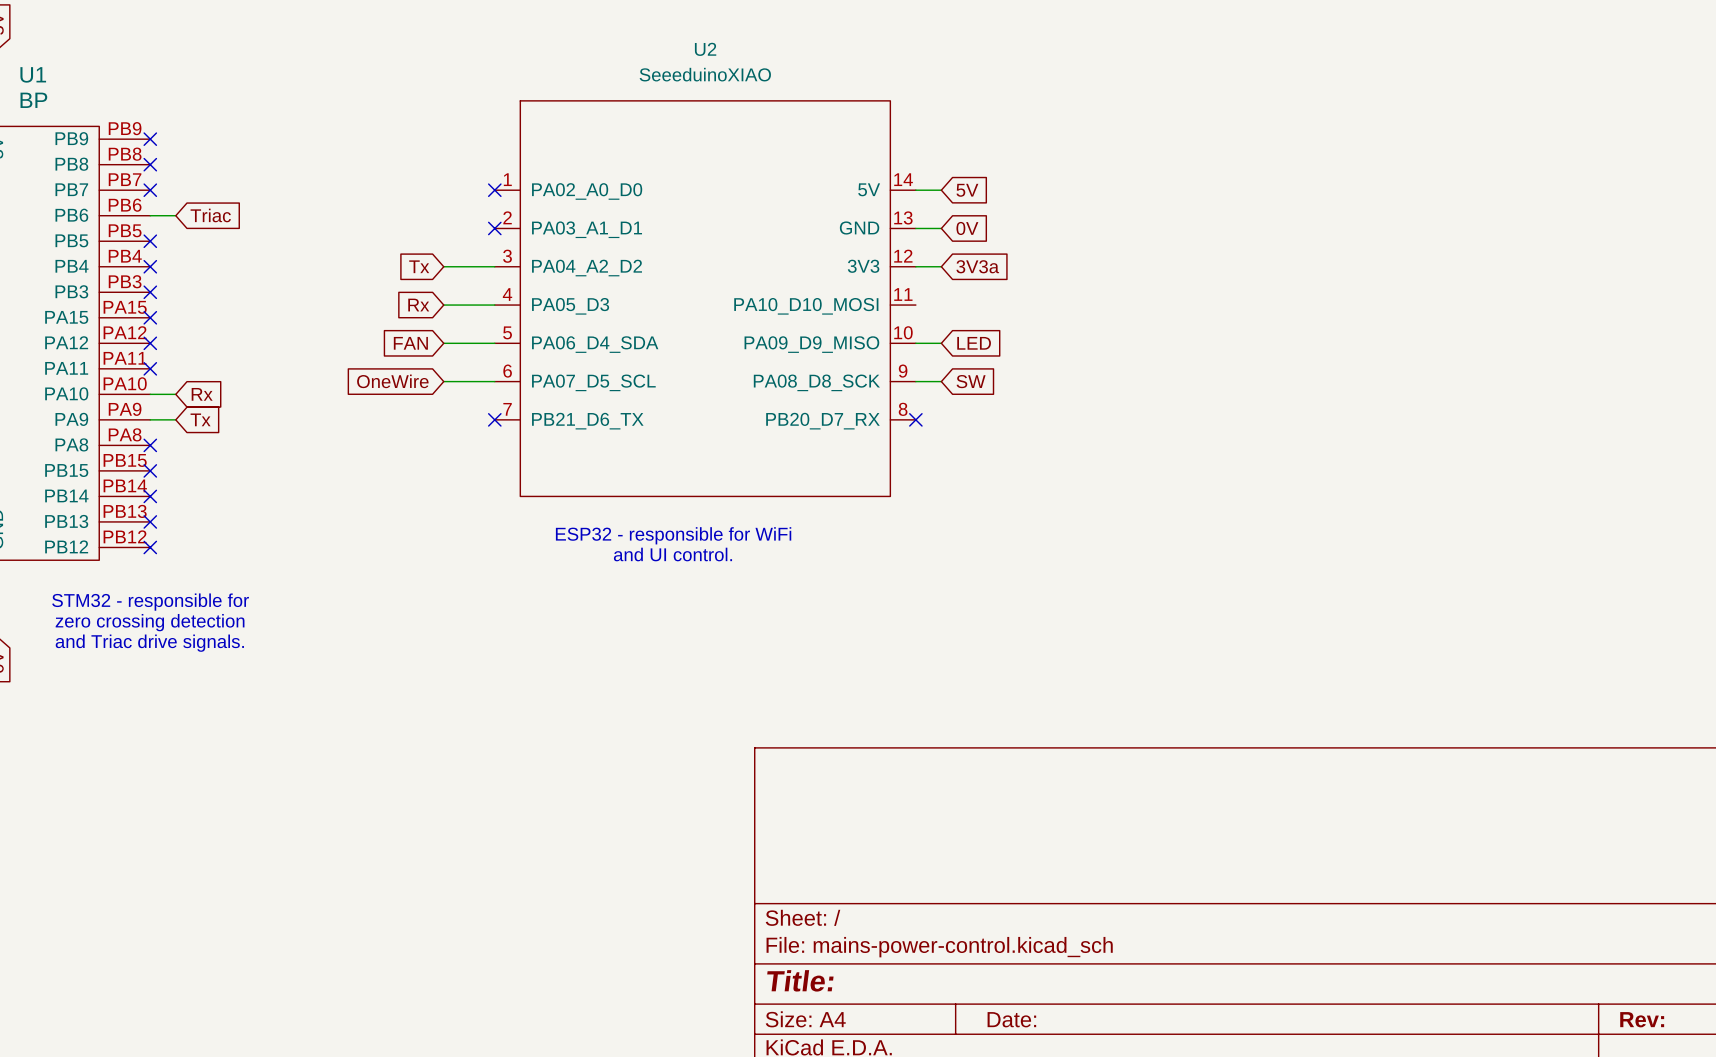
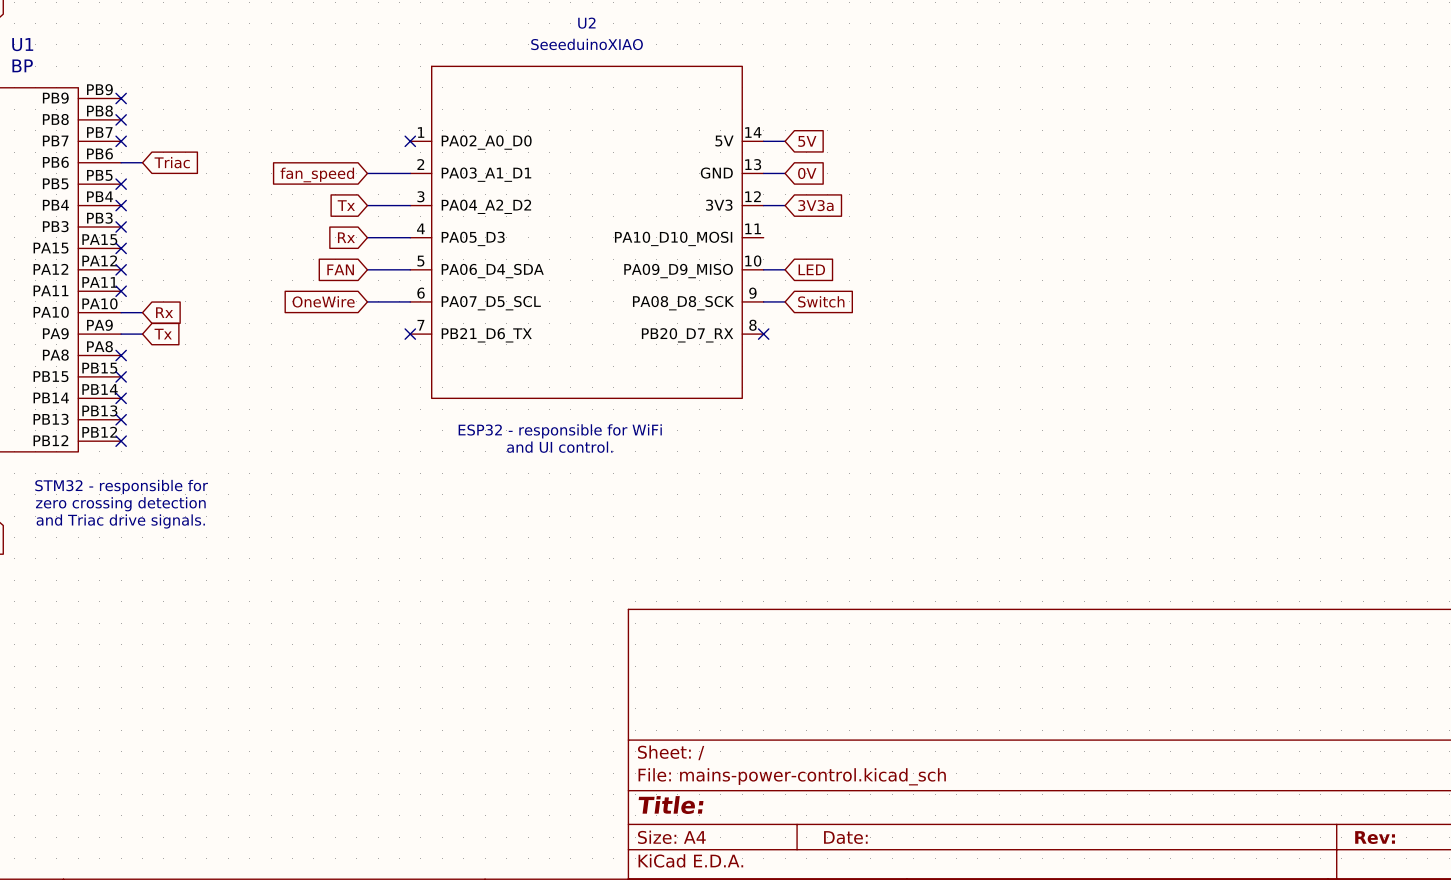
wire: none -> (367, 173) (410, 173)
no-connect mark: (494, 228) -> none
global label: none -> fan_speed (317, 174)
global label: SW (971, 381) -> Switch (821, 301)

